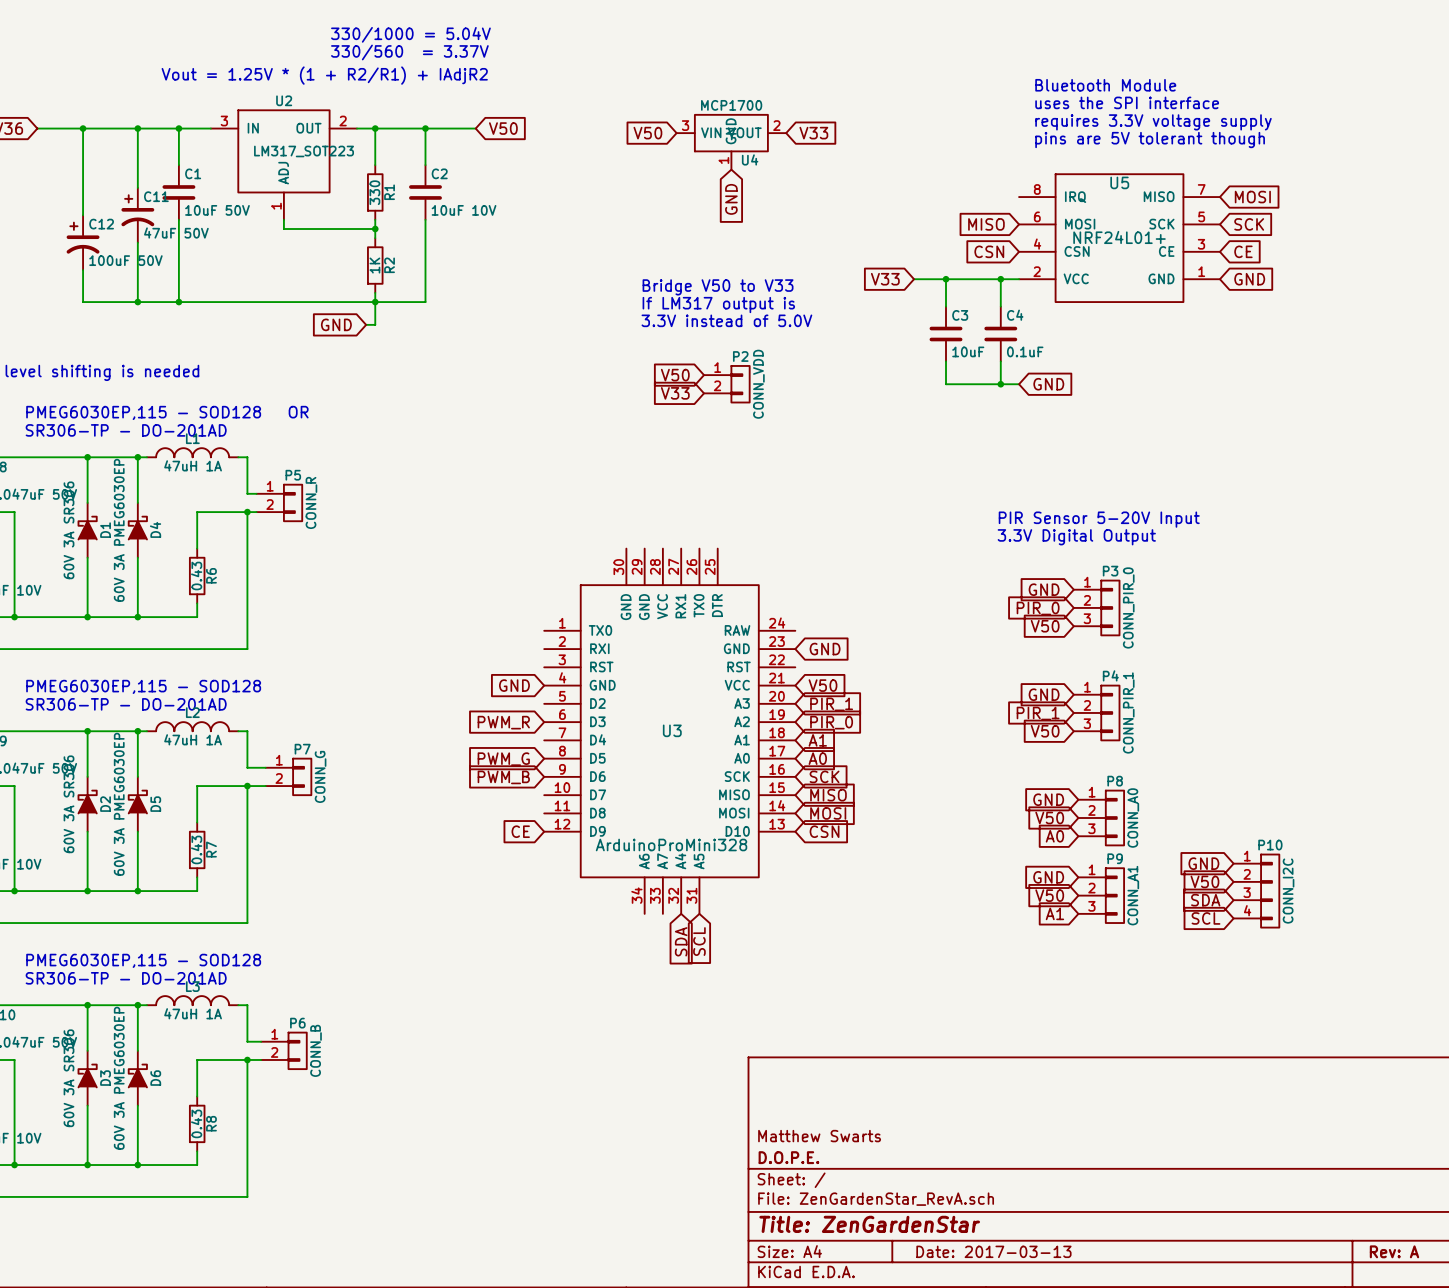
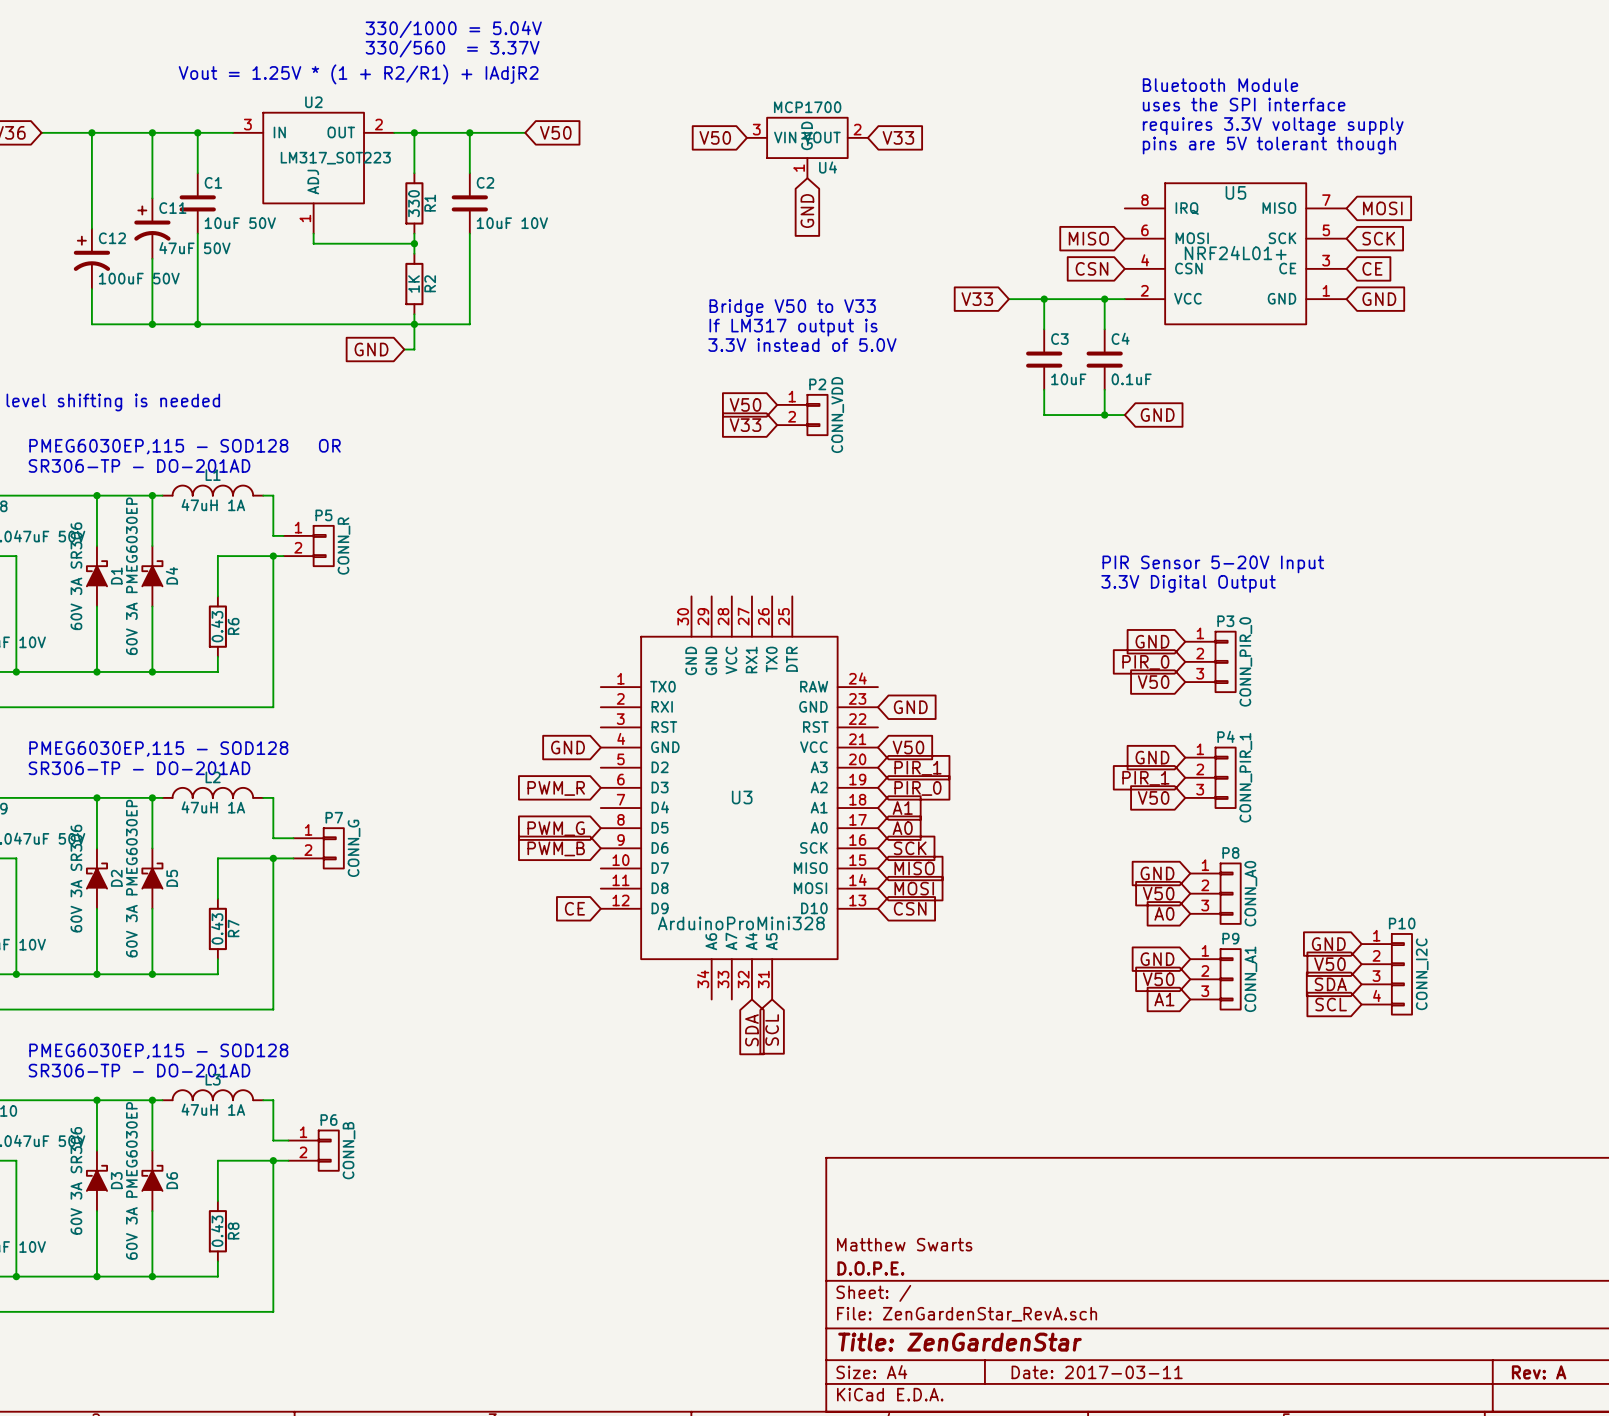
title block: Date: 2017-03-13 (993, 1251) -> Date: 2017-03-11 (1097, 1372)

